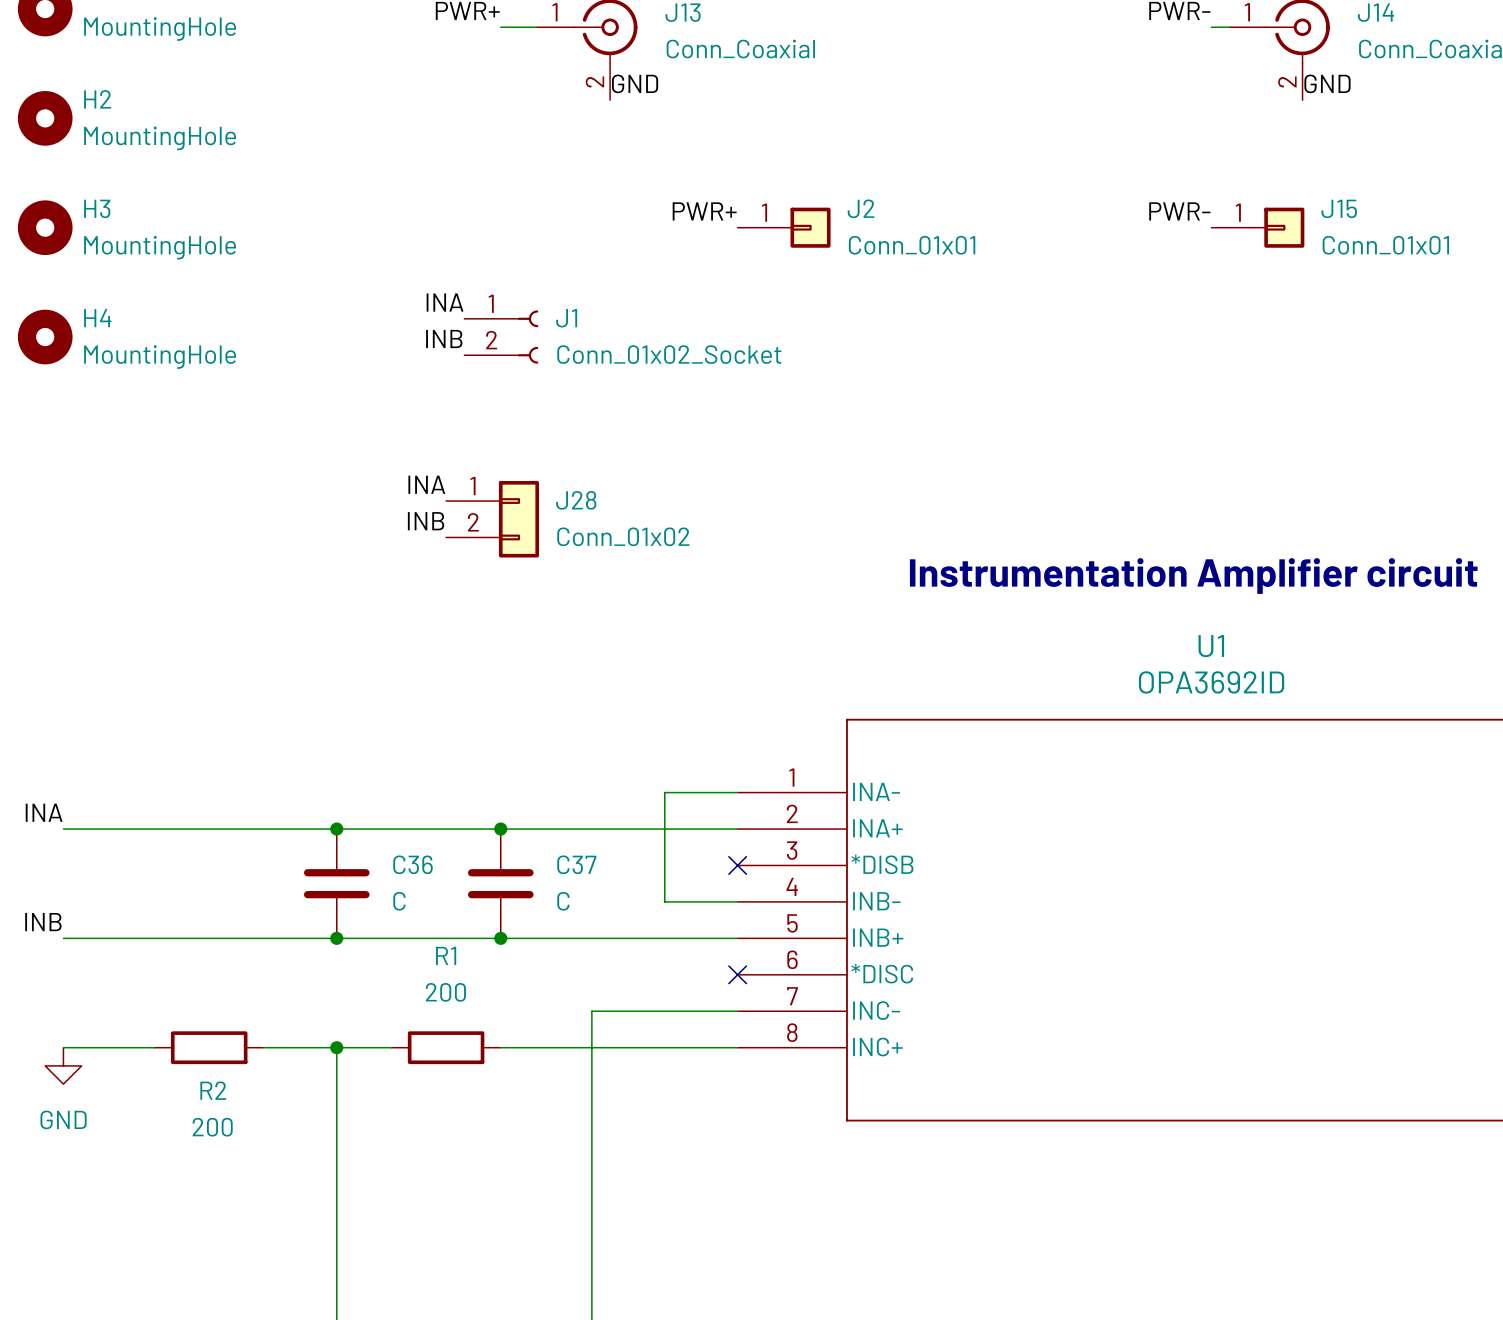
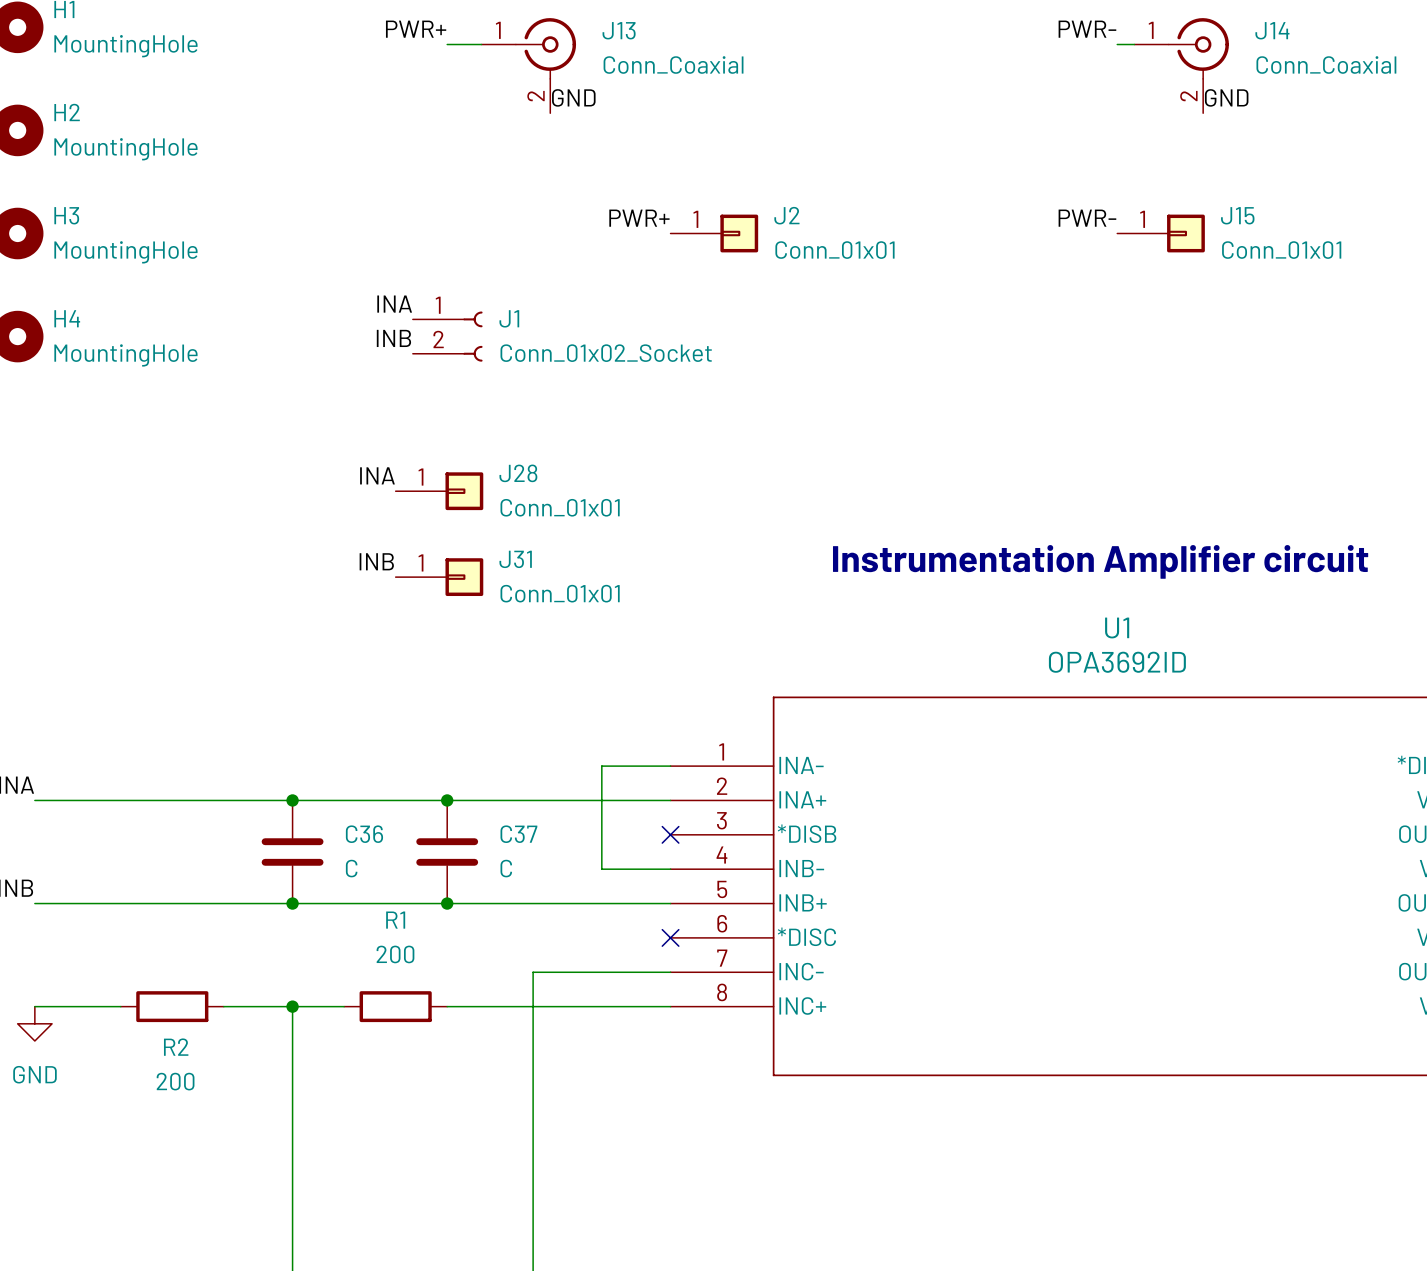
J28 symbol: [446, 480, 540, 558] -> [395, 472, 484, 511]
label position: INB (426, 521) -> INB (376, 561)
J28 value: Conn_01x02 (623, 536) -> Conn_01x01 (560, 507)
J31: none -> Conn_01x01 (439, 577)

